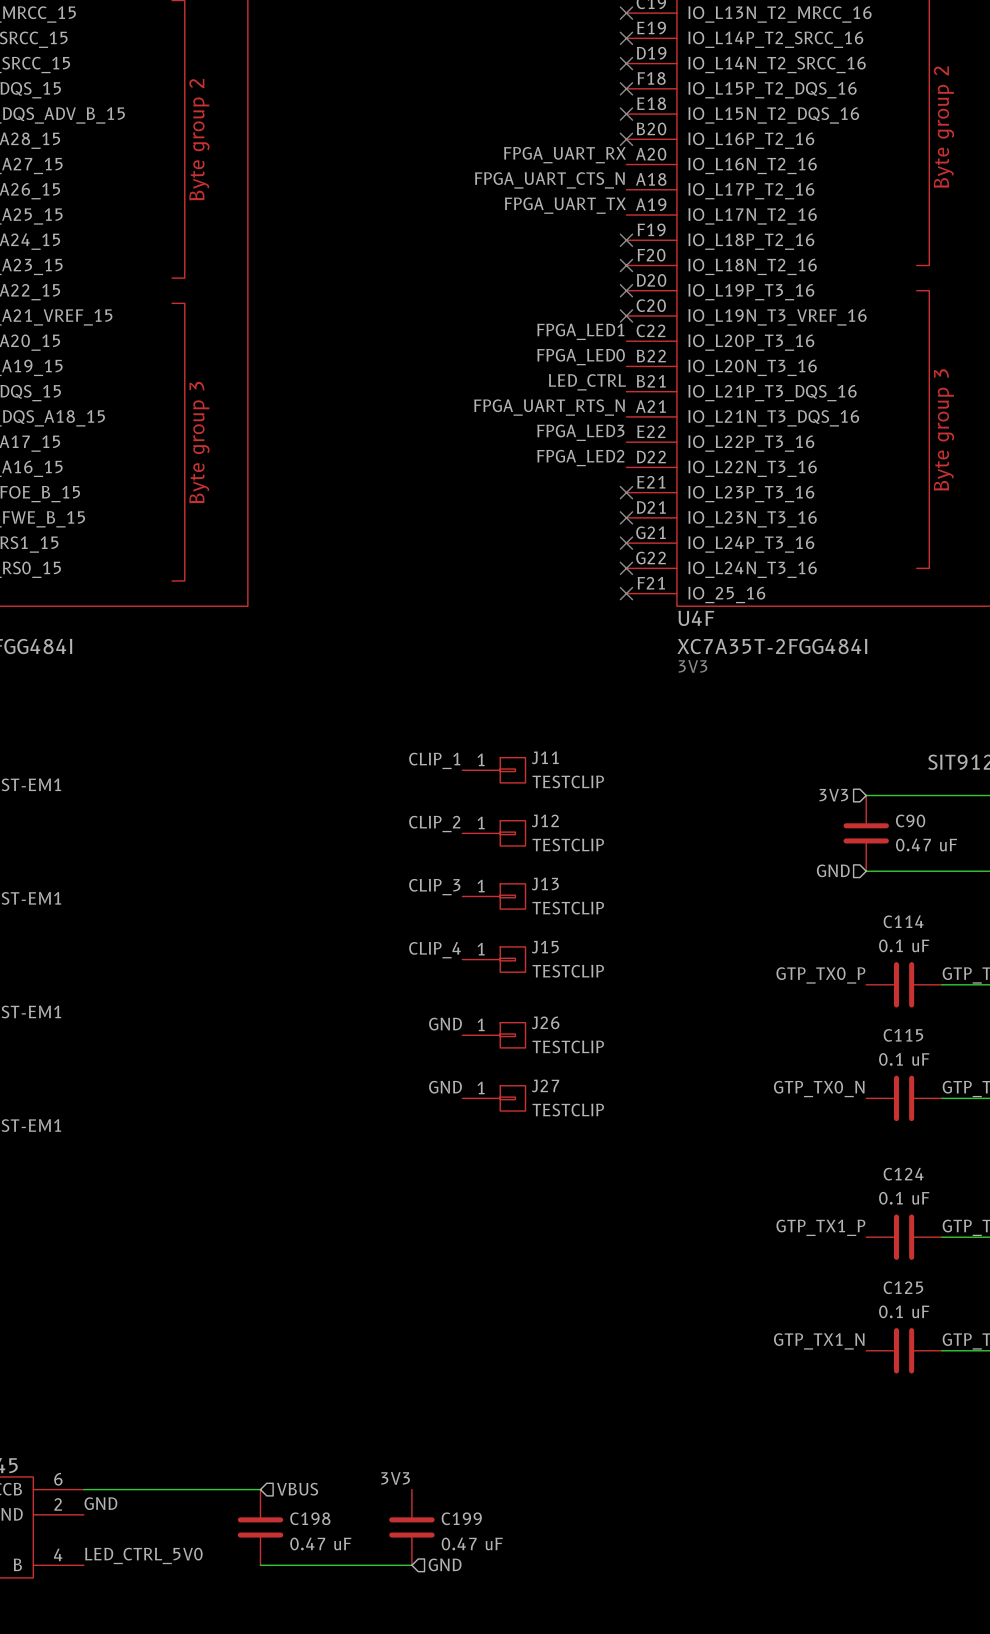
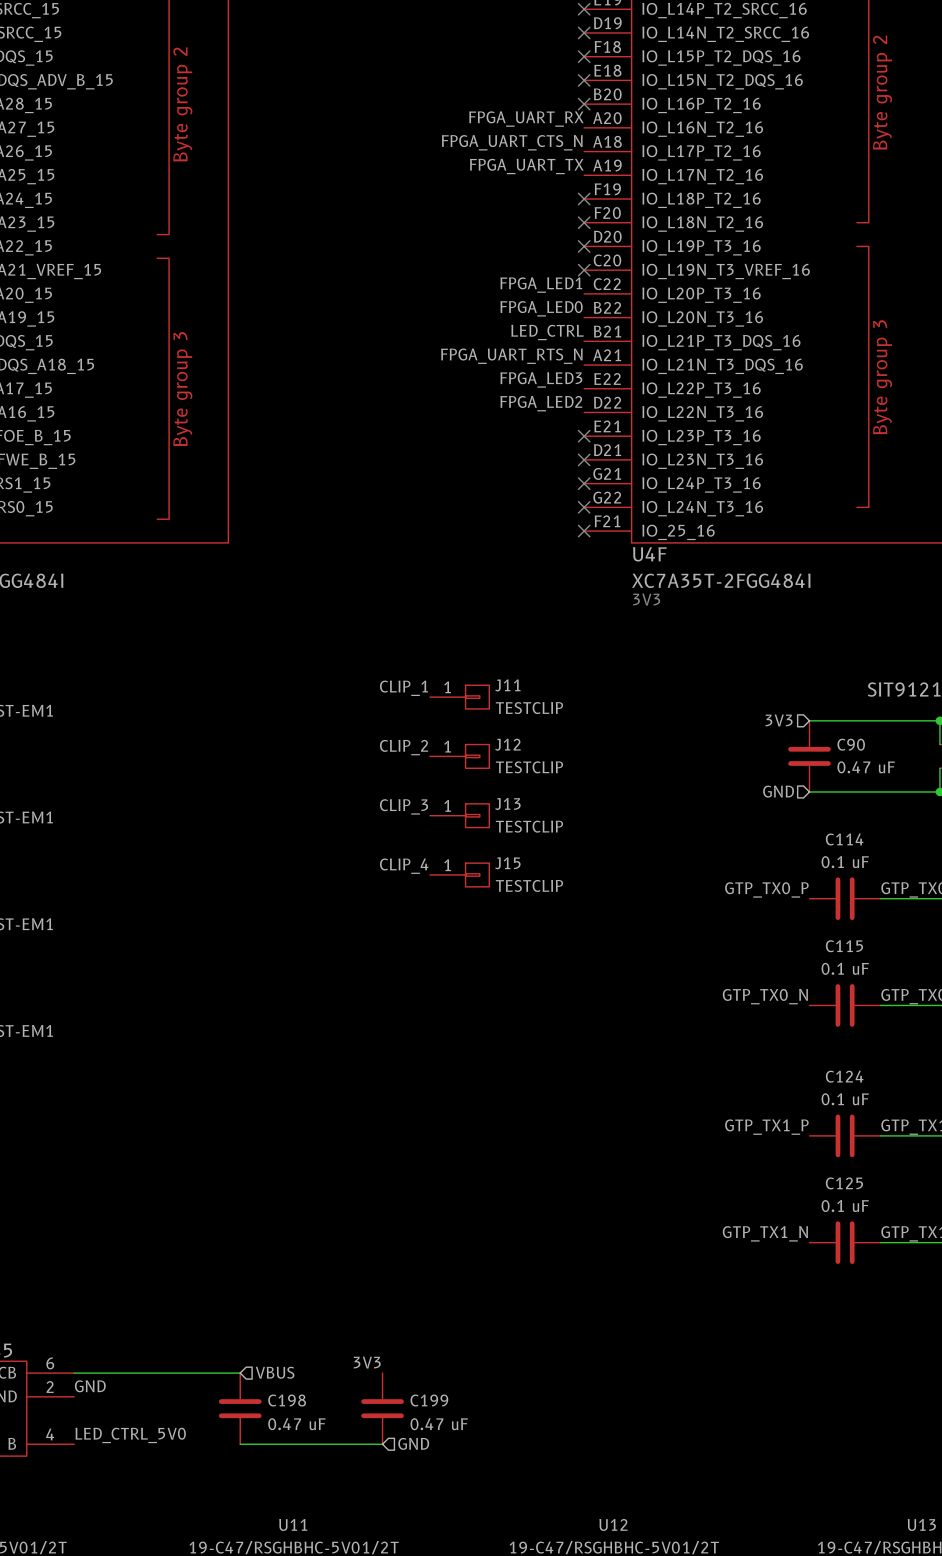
label: GND (445, 1024) -> none
J26: TESTCLIP (493, 1035) -> none
label: GND (445, 1087) -> none
J27: TESTCLIP (493, 1098) -> none

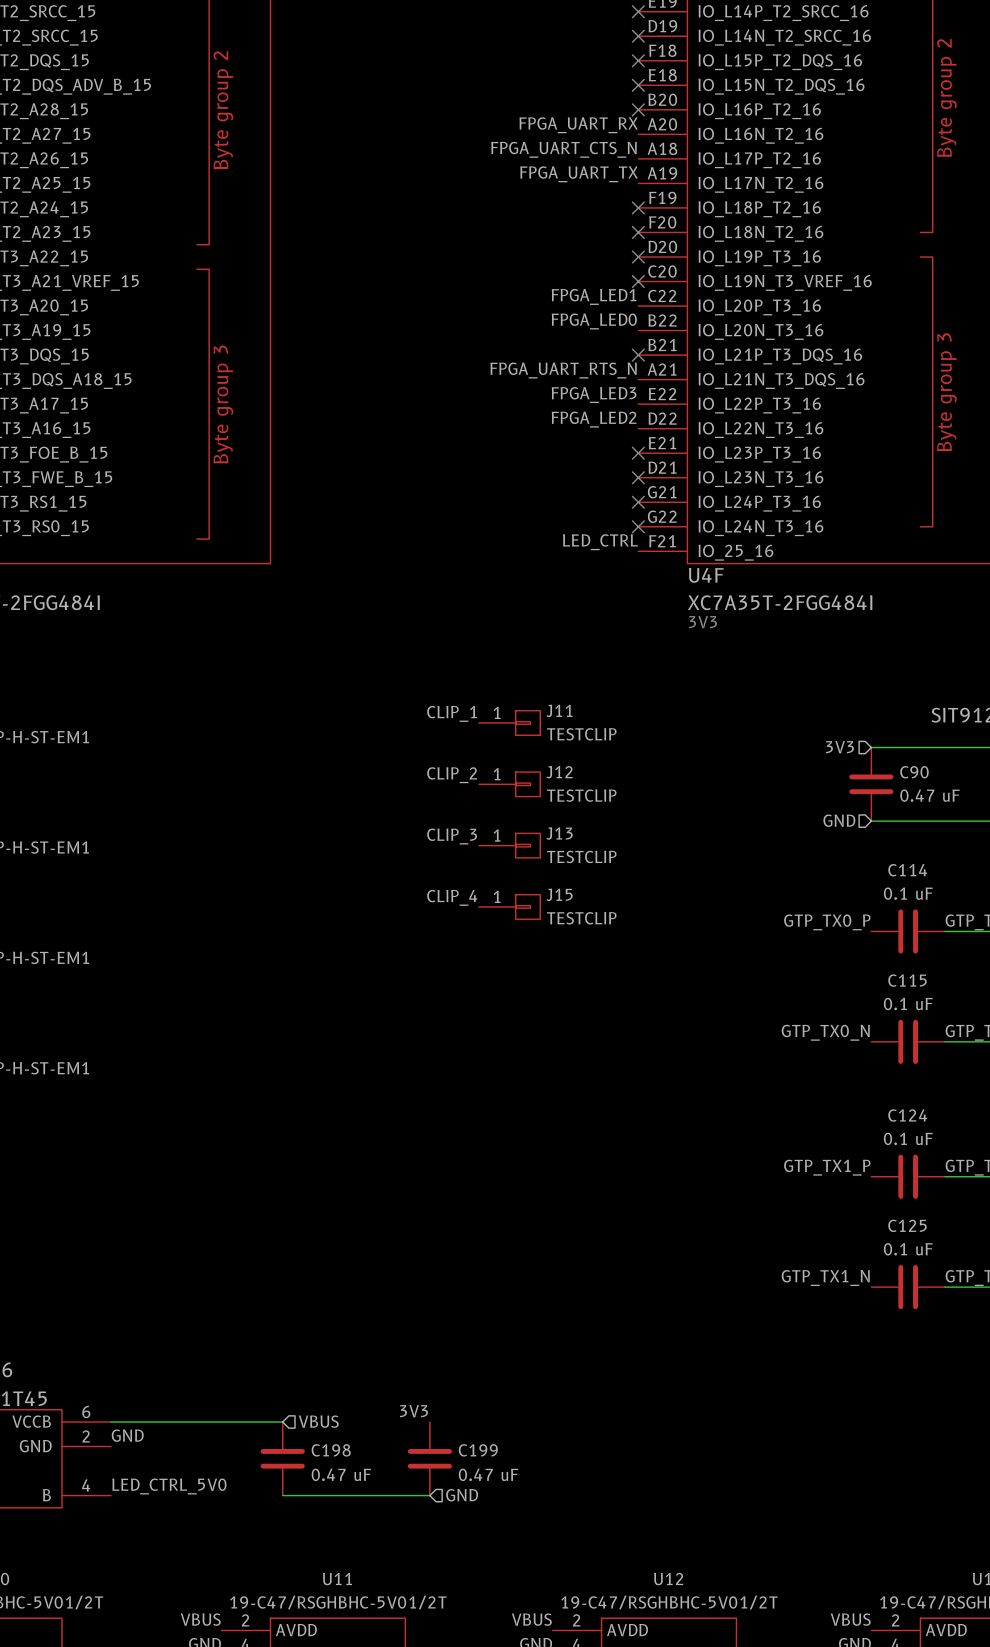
label position: LED_CTRL (547, 332) -> LED_CTRL (600, 542)
no-connect mark: none -> (638, 355)
no-connect mark: (584, 531) -> none

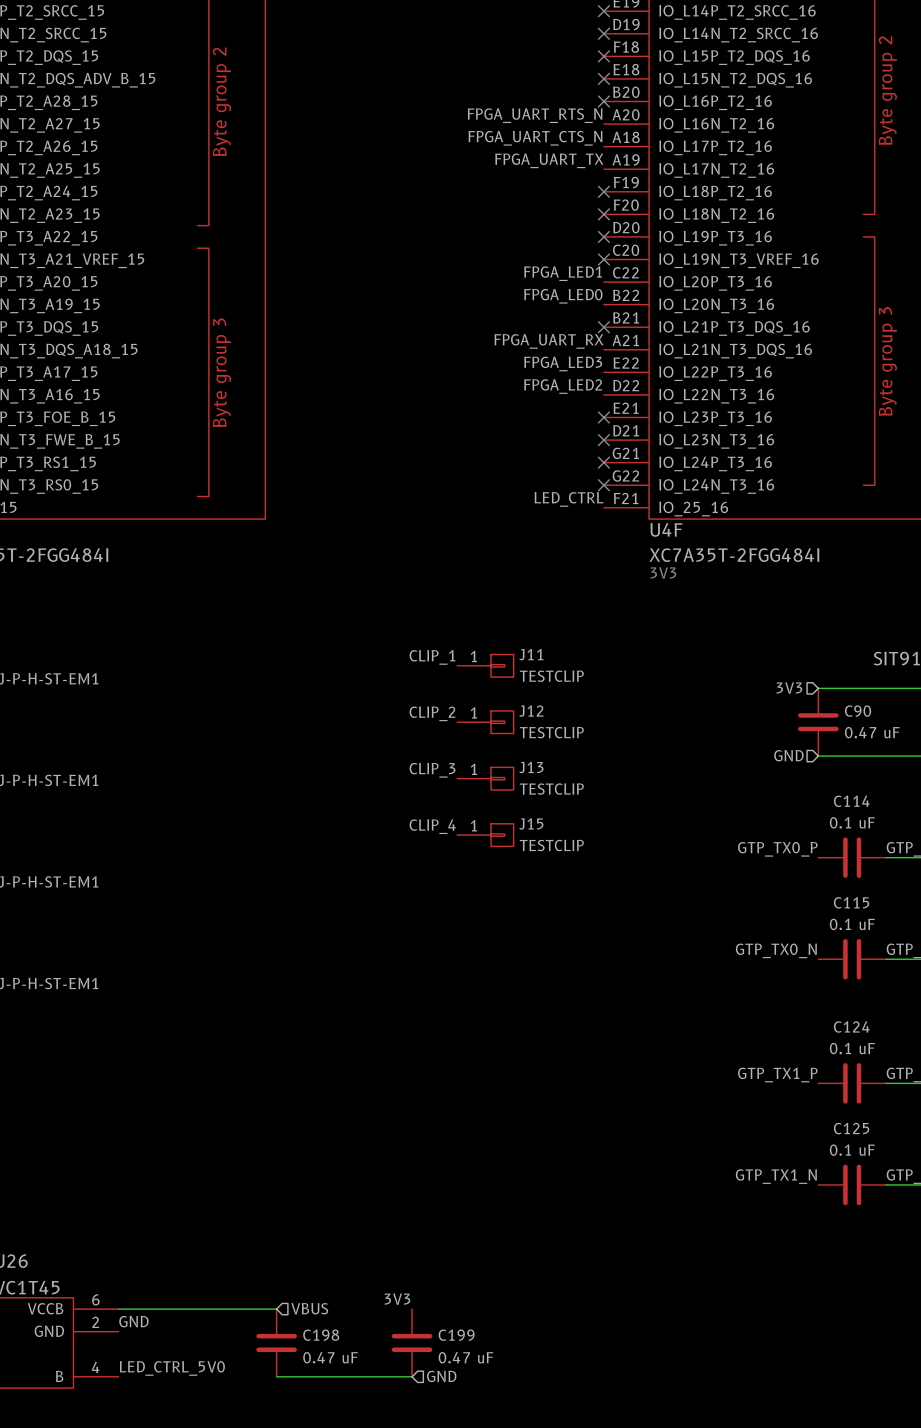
label: FPGA_UART_RX (578, 125) -> FPGA_UART_RTS_N (535, 115)
label: FPGA_UART_RTS_N (563, 370) -> FPGA_UART_RX (548, 341)

